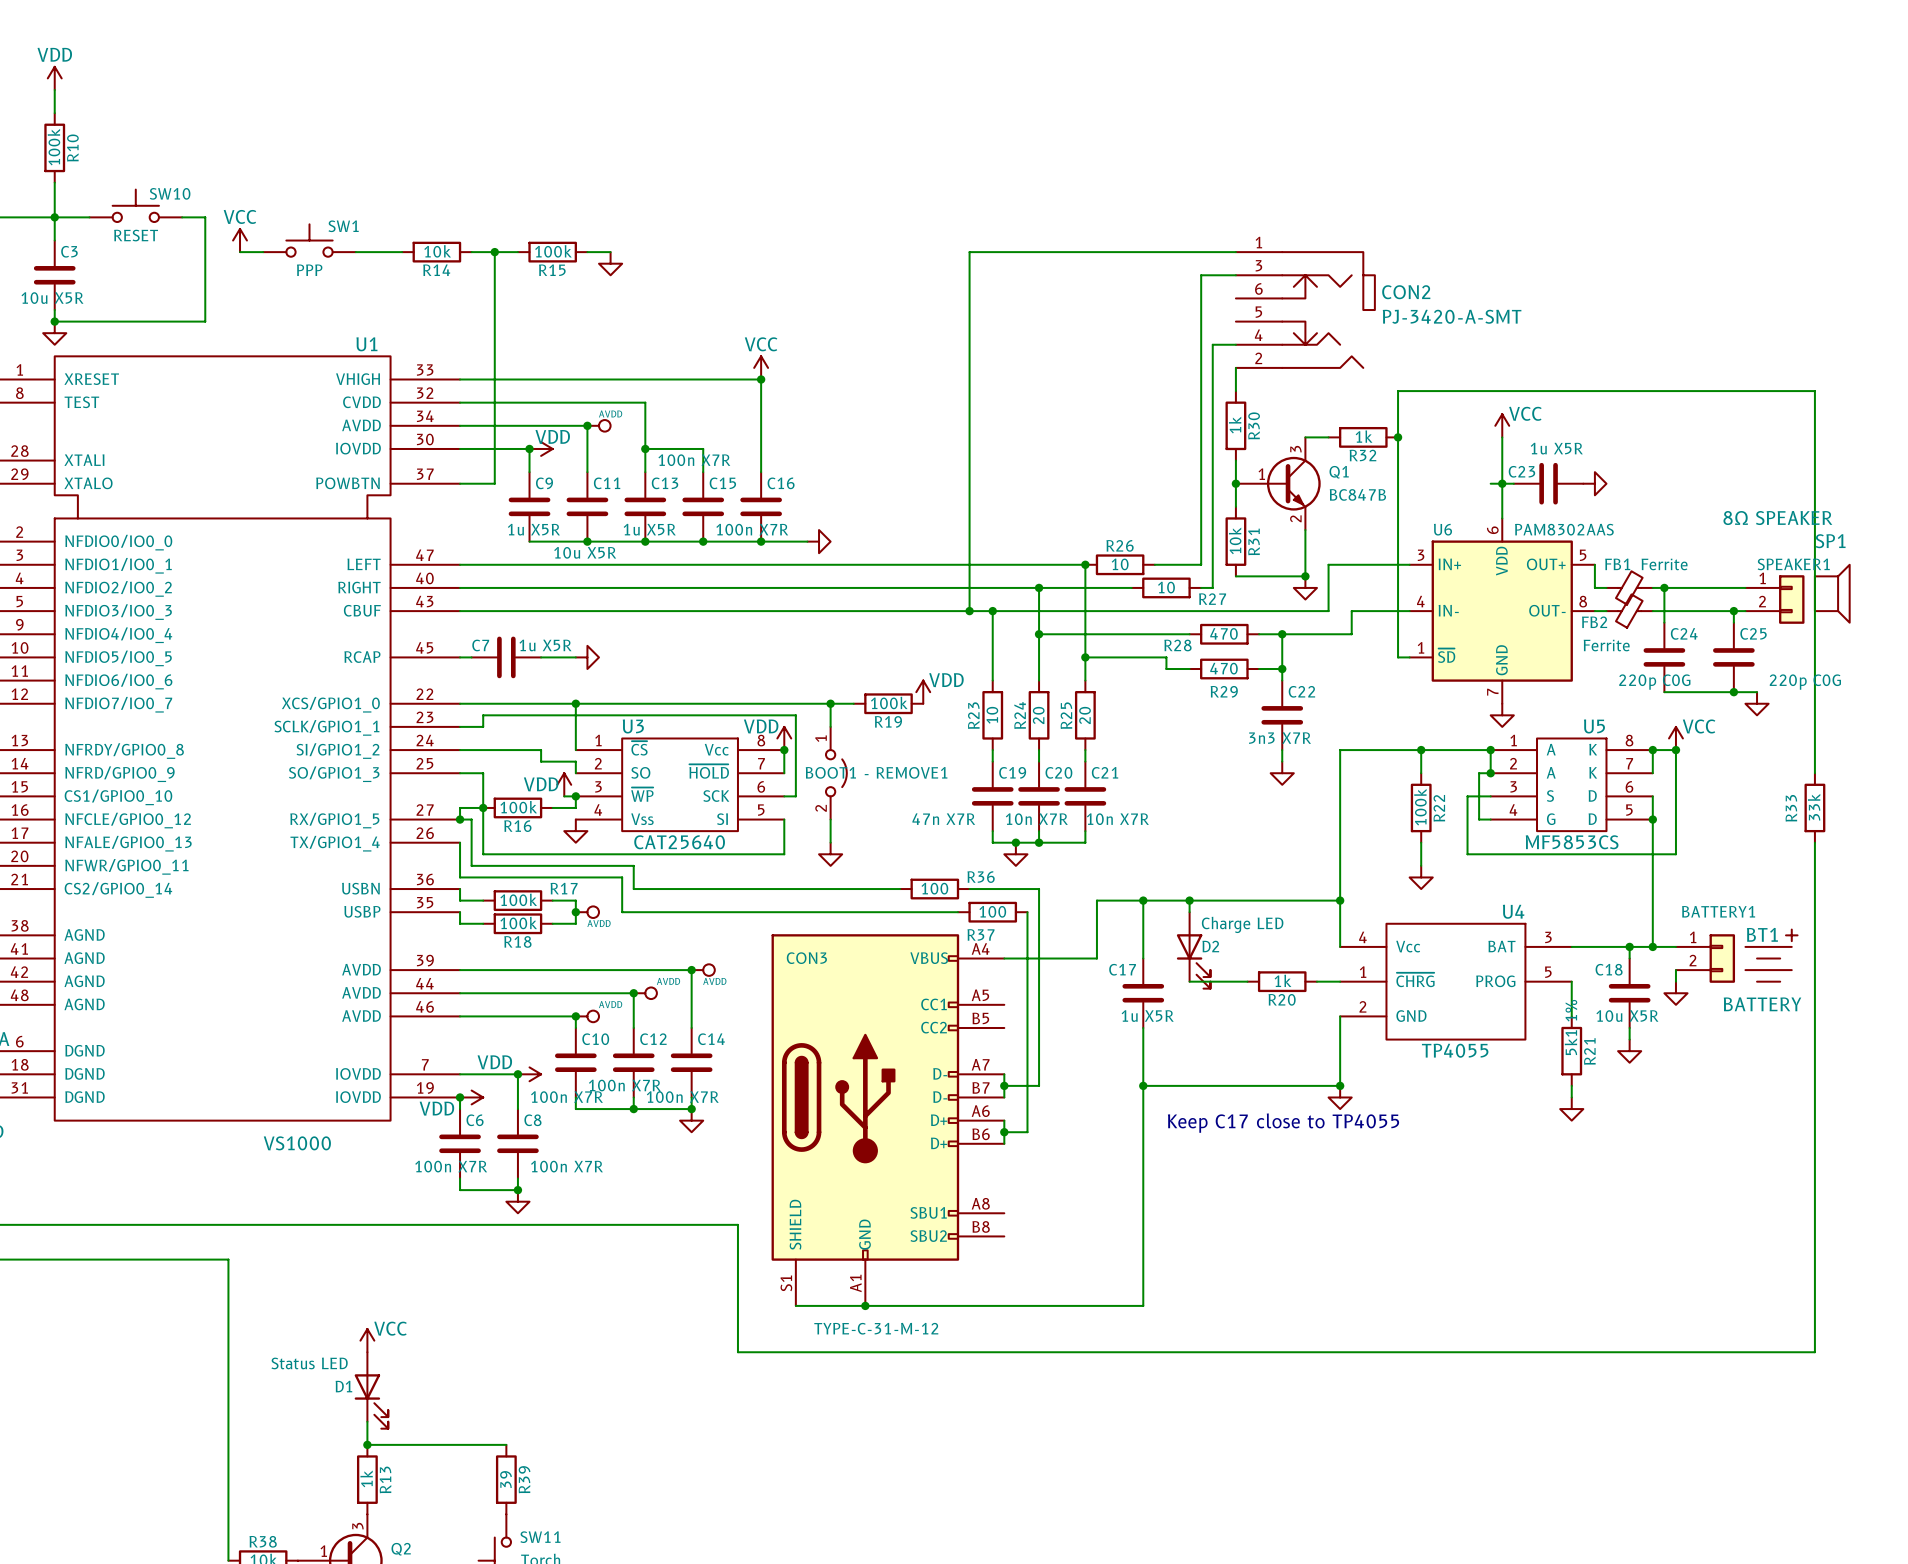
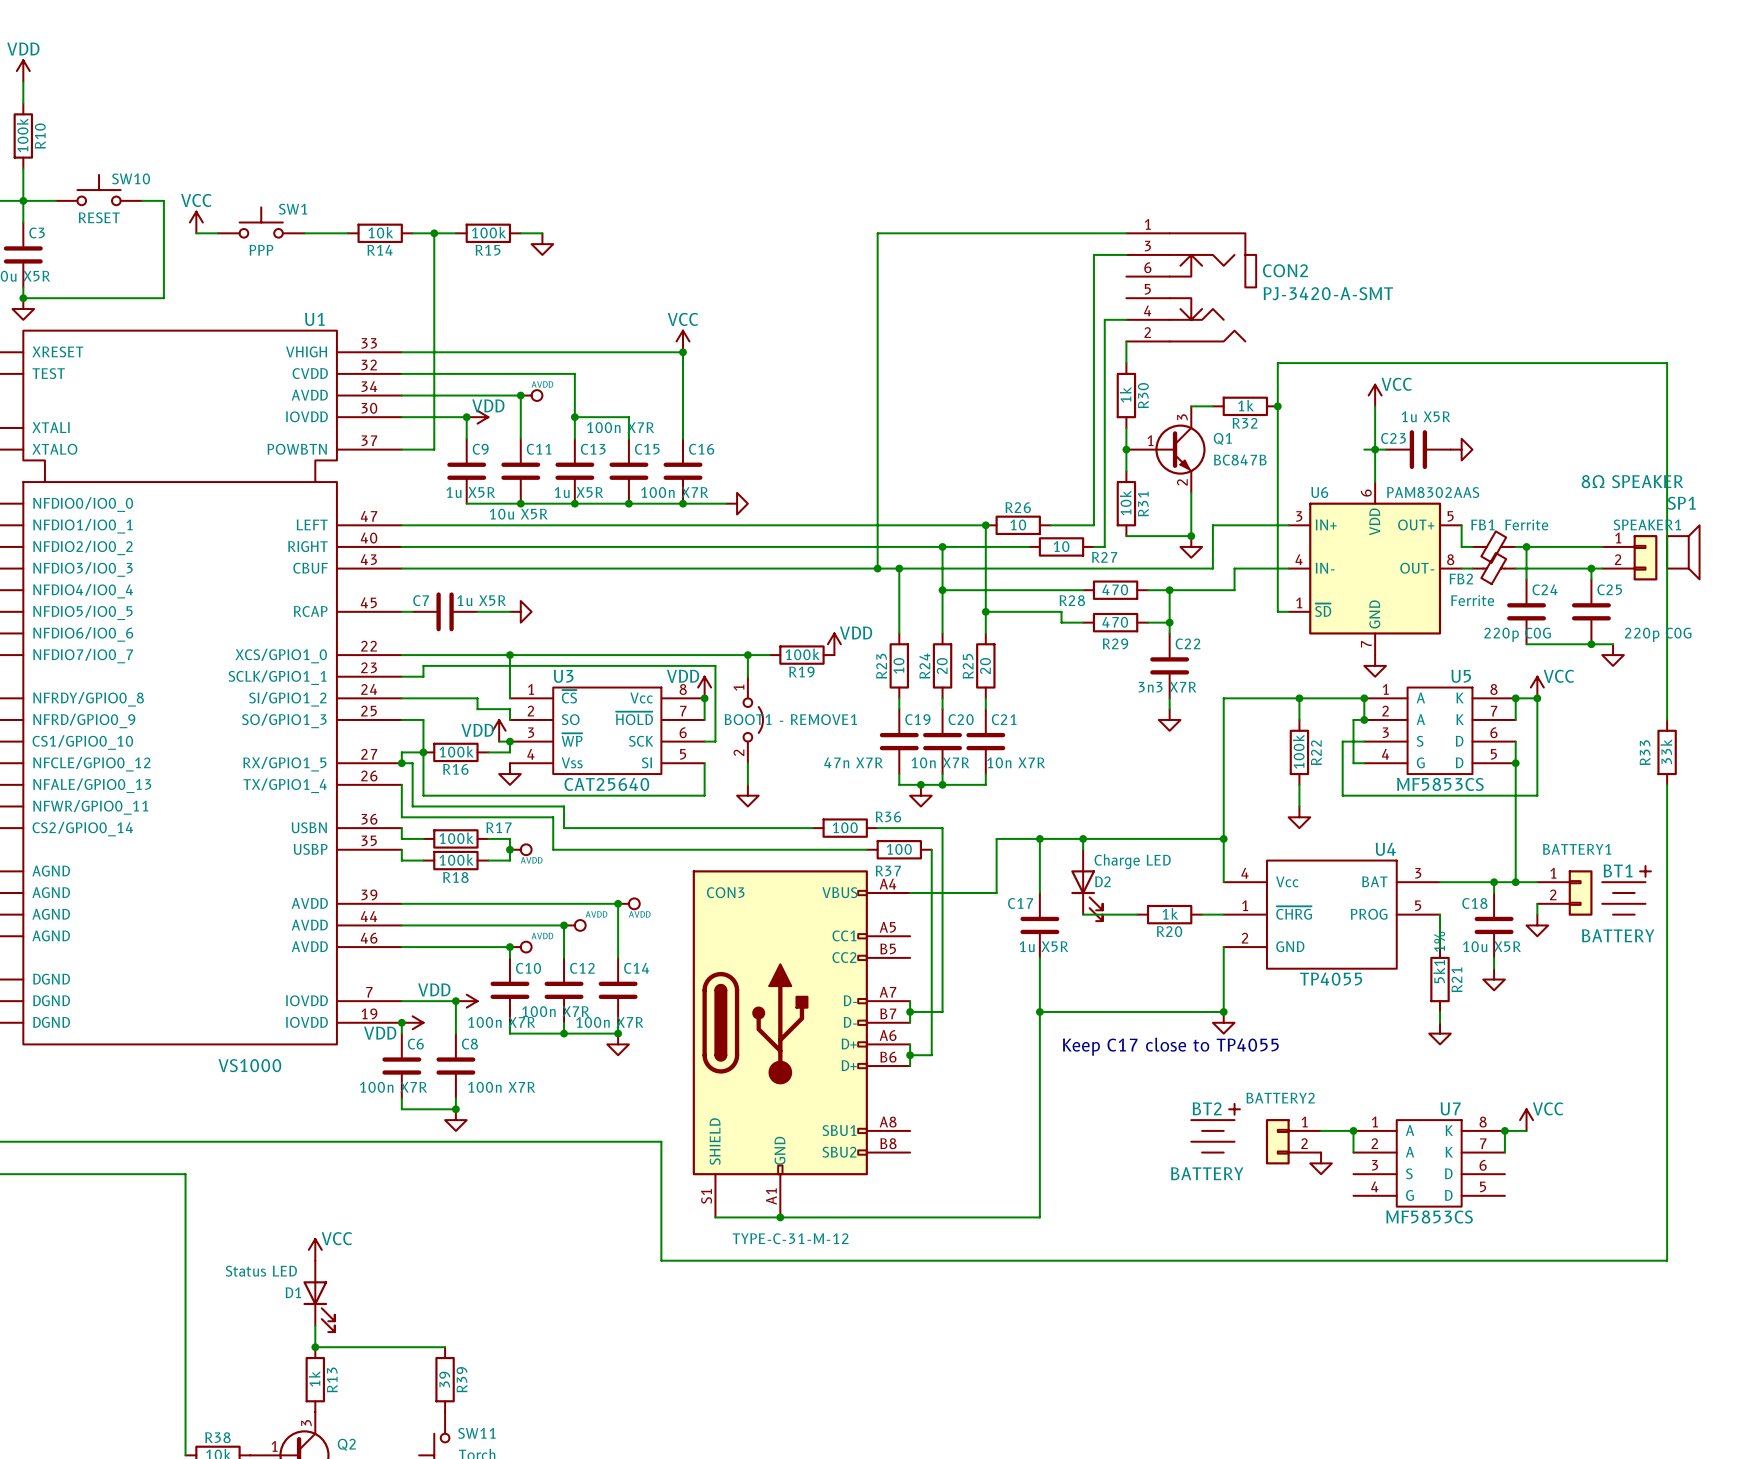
power symbol: none -> VCC (1526, 1120)
BT2: none -> BATTERY (1215, 1128)
wire: none -> (1321, 1130) (1353, 1130) (1353, 1152)
junction: none -> (1353, 1130)
junction: none -> (1504, 1130)
wire: none -> (1526, 1130) (1504, 1130) (1504, 1152)
BATTERY2: none -> (1293, 1141)
power symbol: none -> (1321, 1163)
U7: none -> MF5853CS (1429, 1163)

